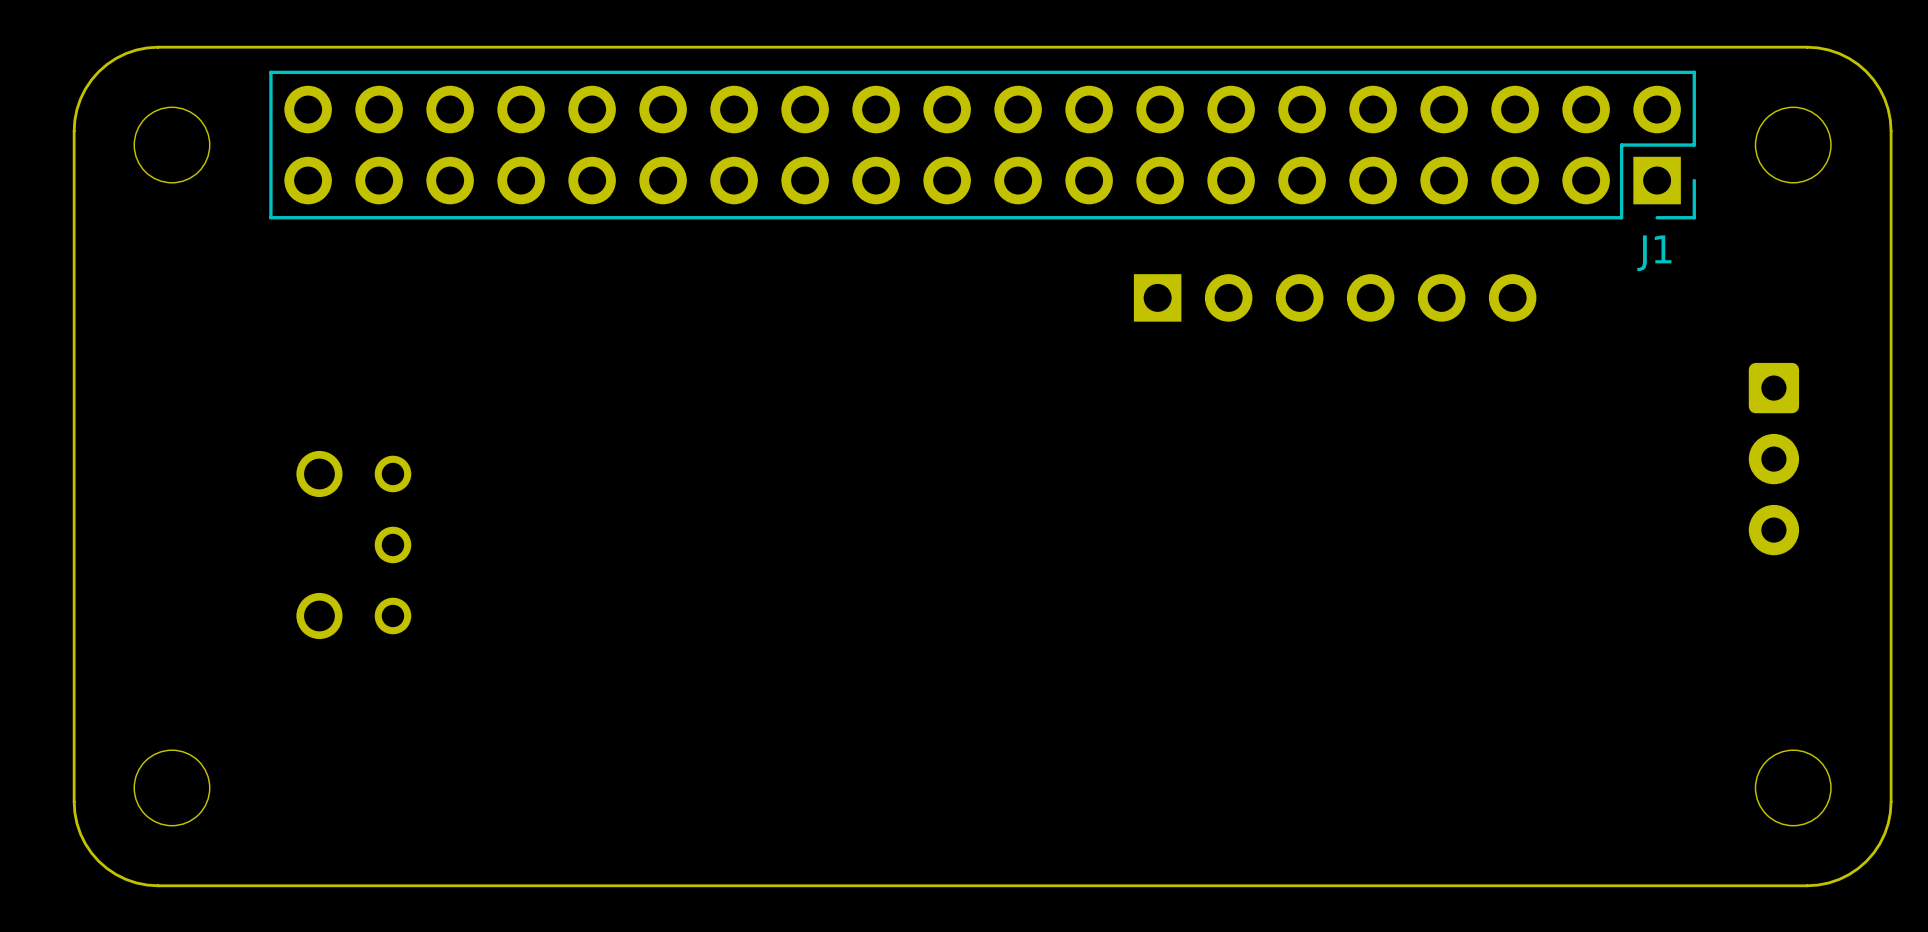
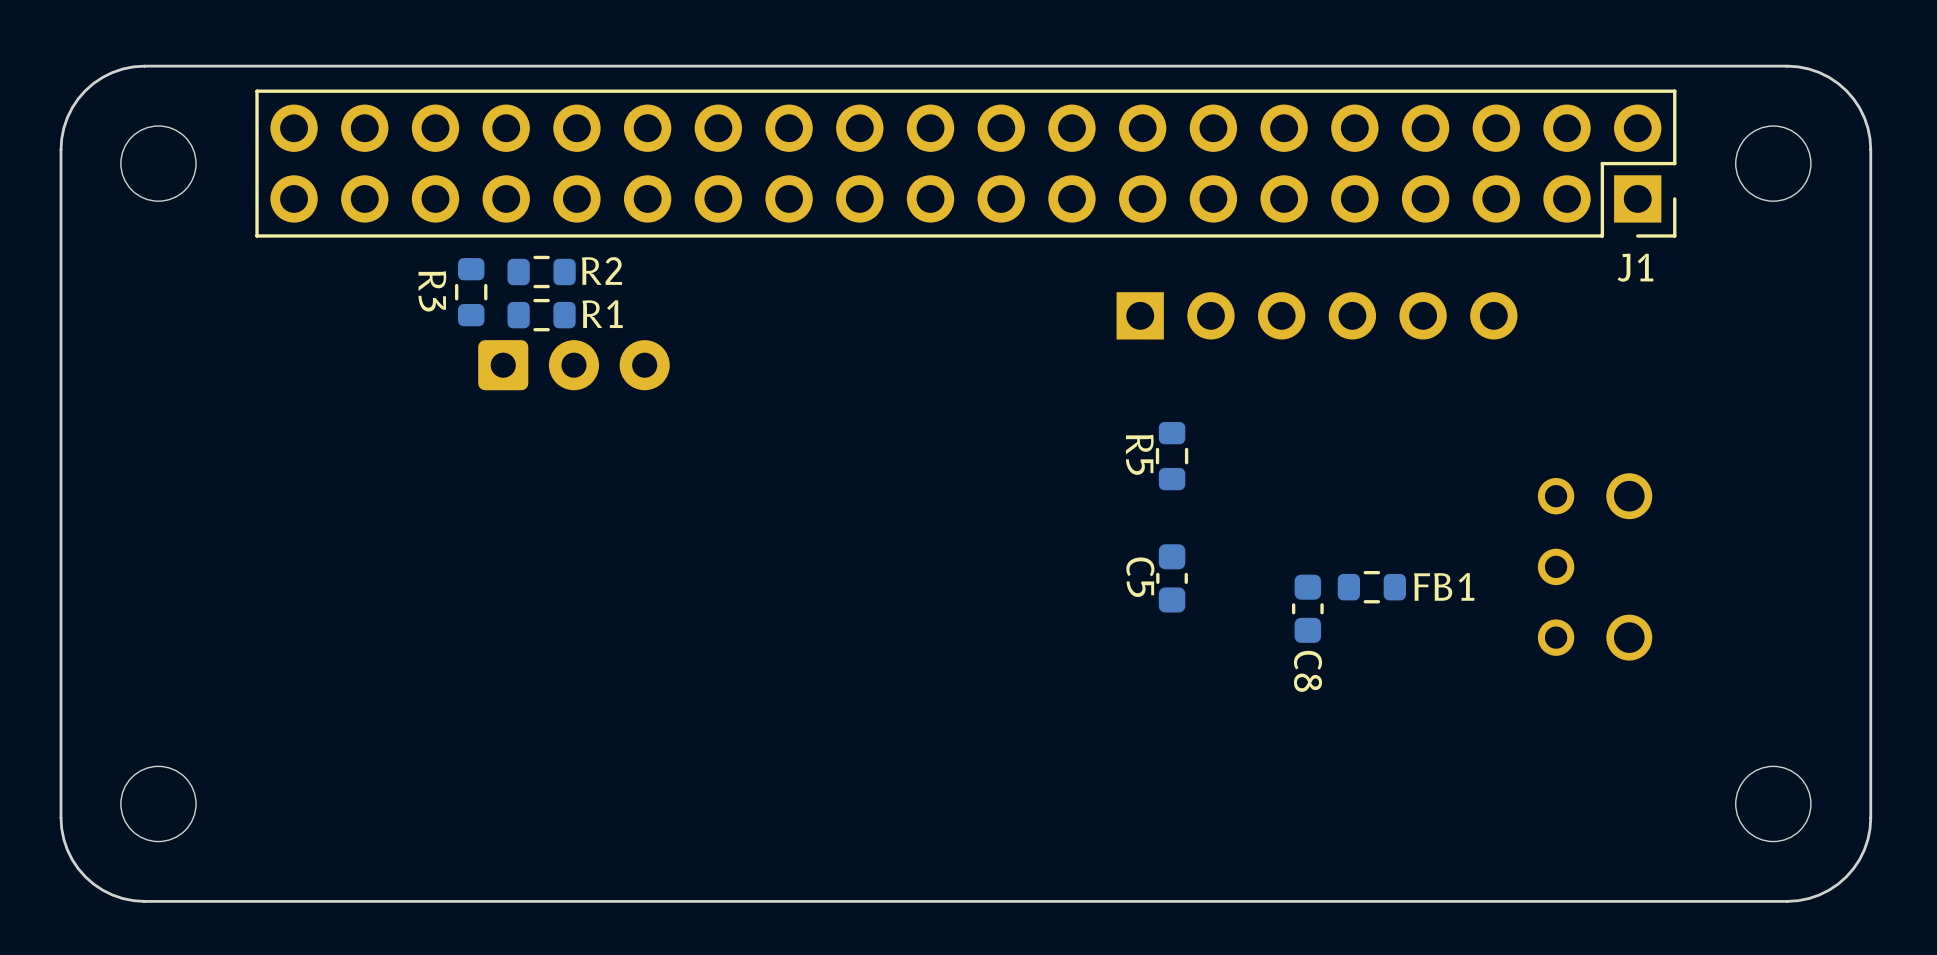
R2: none -> (541, 272)
R3: none -> (471, 292)
R1: none -> (541, 315)
part: none -> (573, 365)
R5: none -> (1172, 456)
part: (1773, 459) -> none
part: (353, 544) -> none
part: none -> (1595, 566)
C5: none -> (1172, 578)
FB1: none -> (1371, 587)
C8: none -> (1307, 608)

